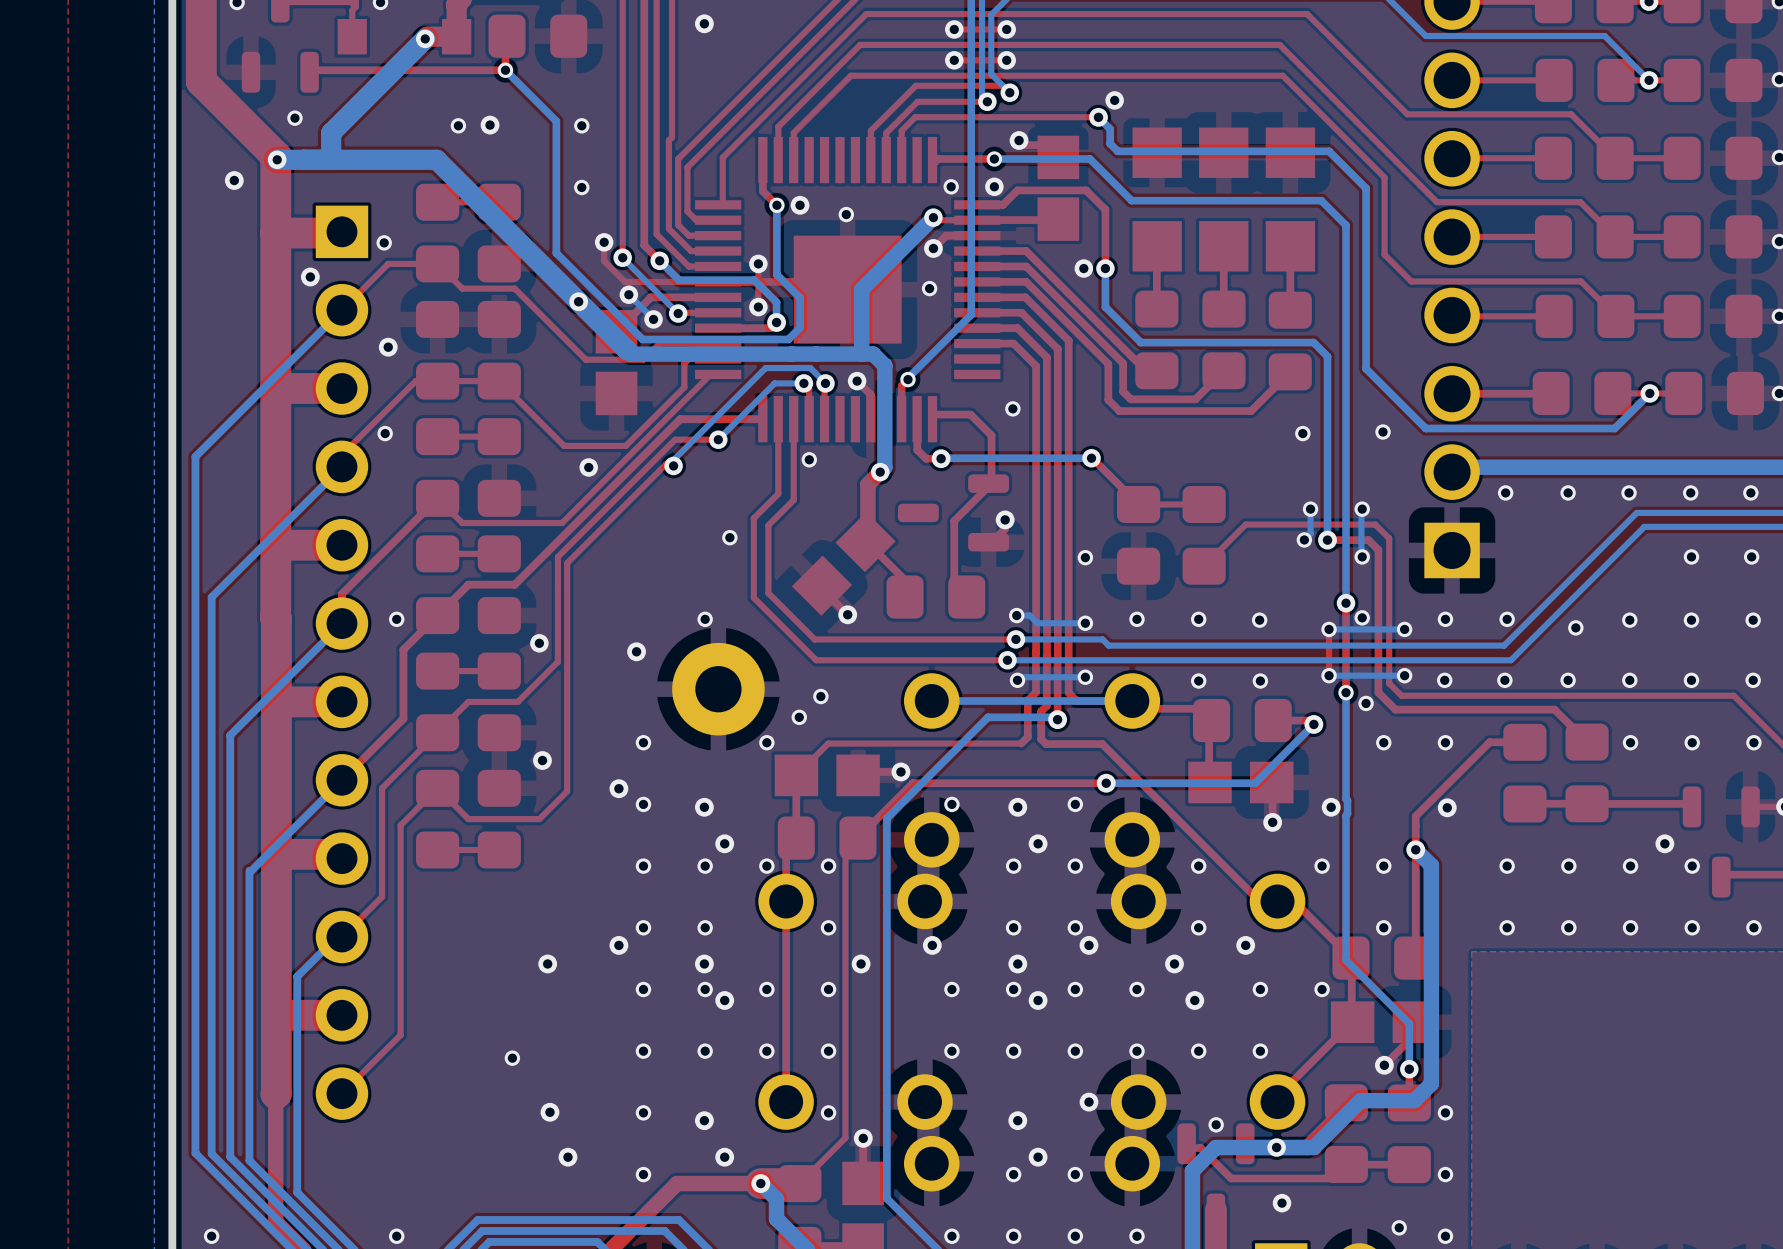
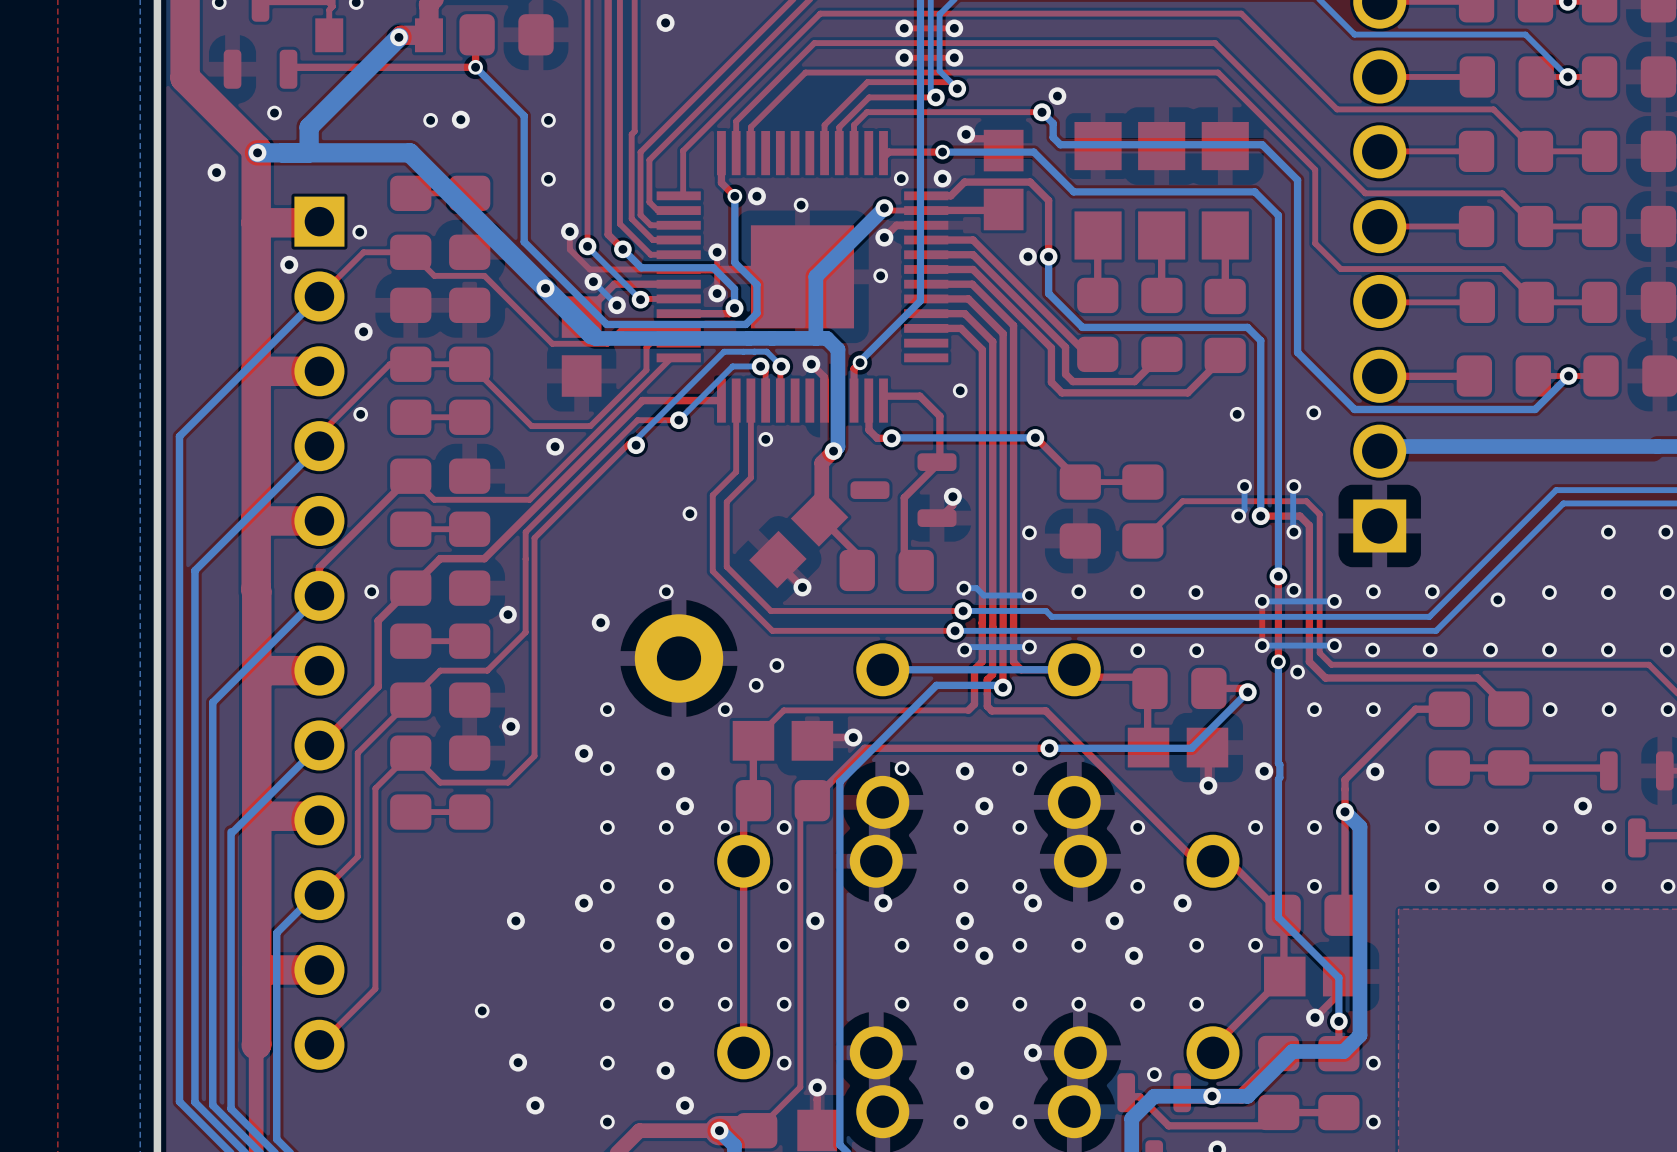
via: (1505, 492) -> none
via: (1568, 492) -> none
via: (1629, 492) -> none
via: (1690, 492) -> none
via: (1750, 492) -> none

